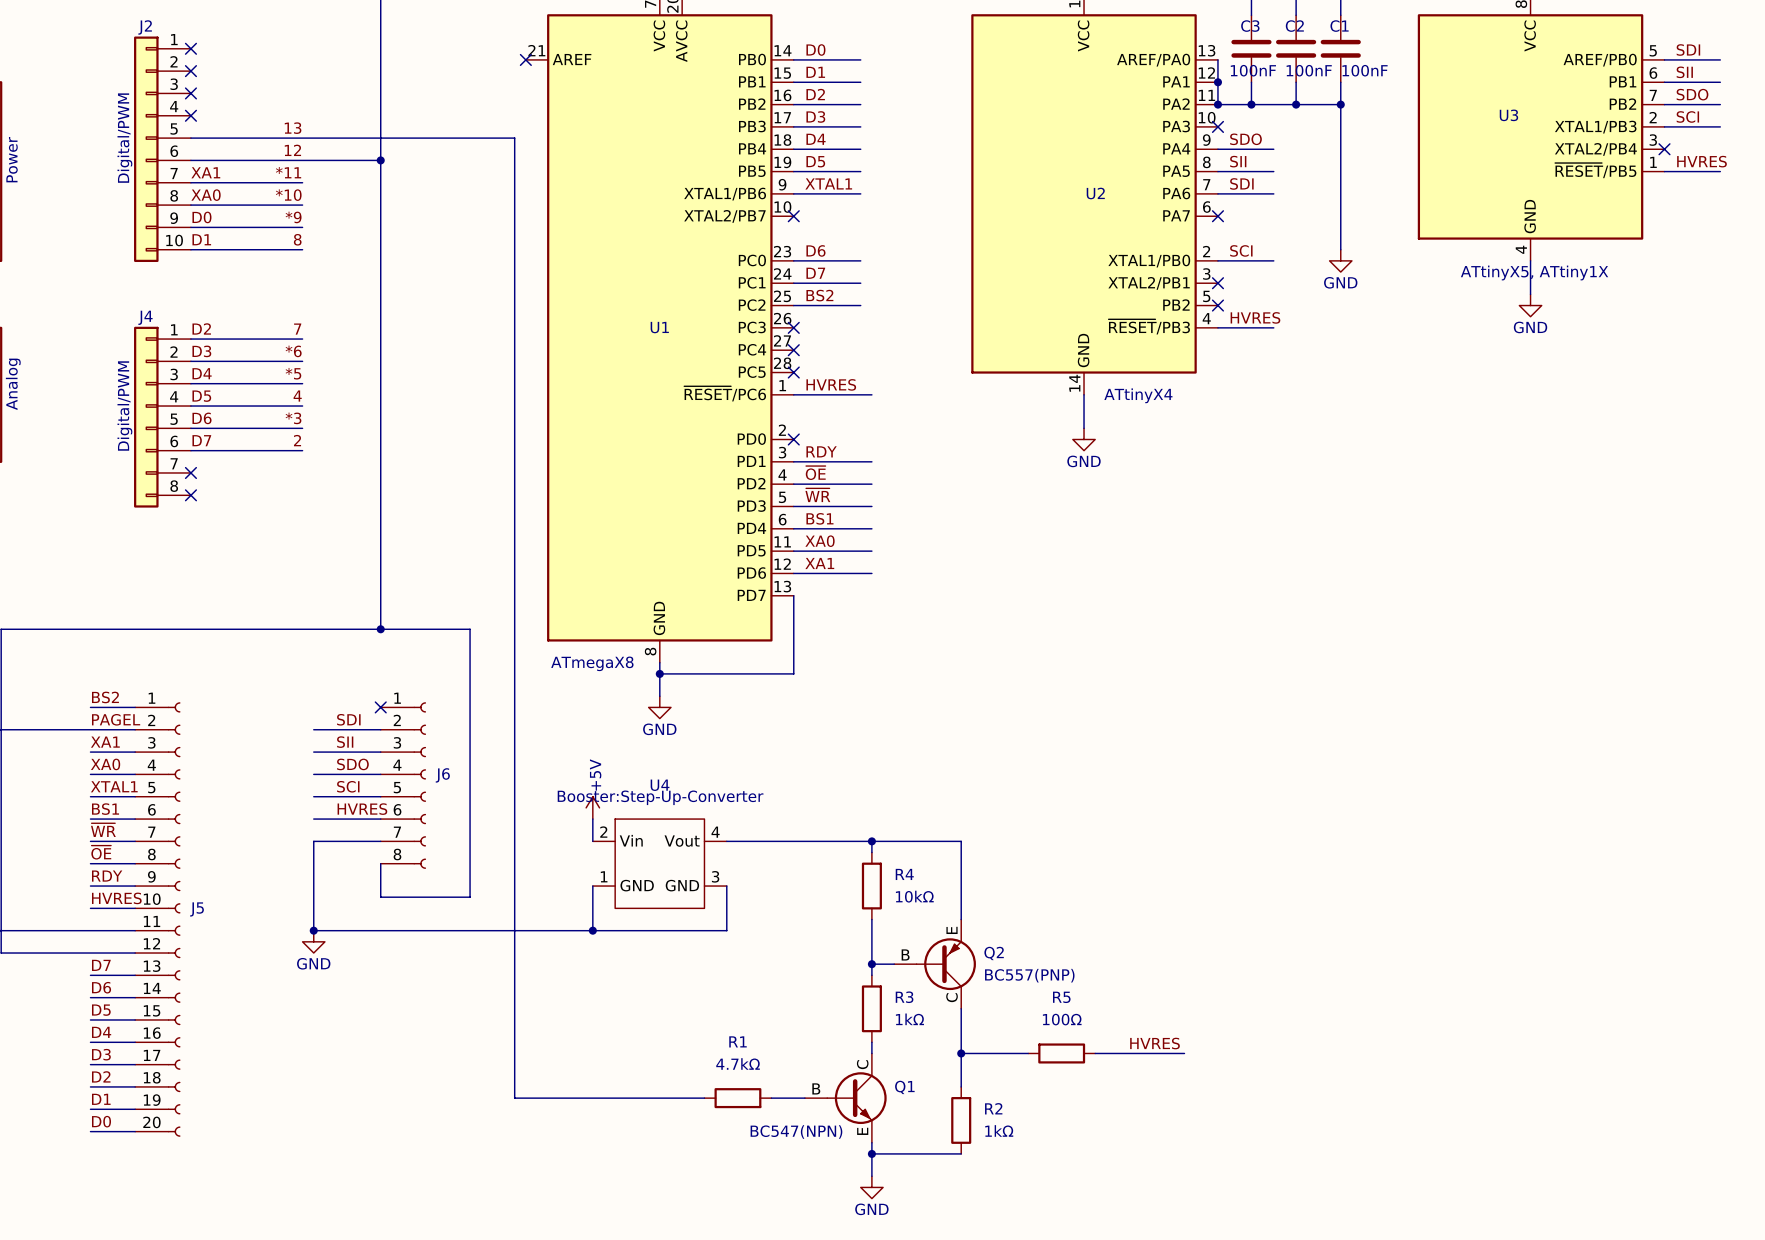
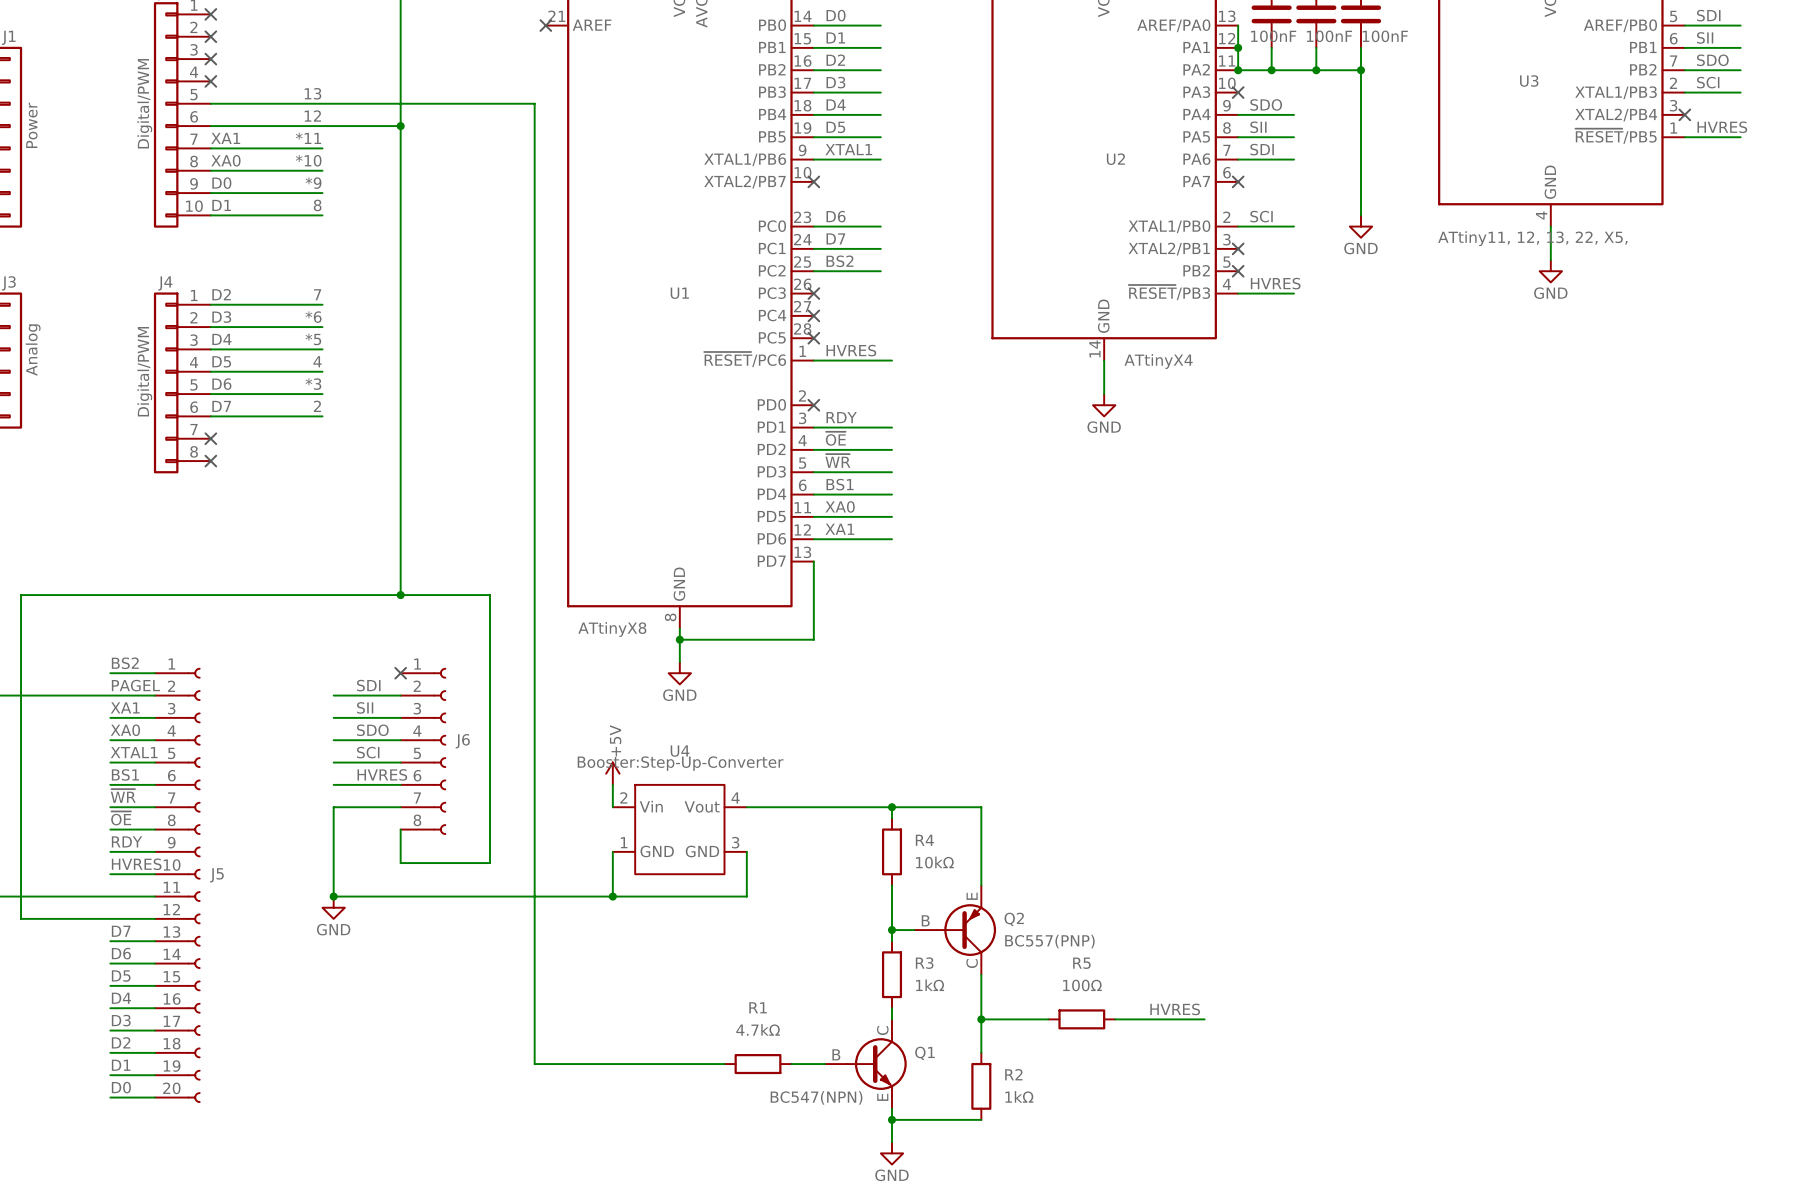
U3 value: ATtinyX5, ATtiny1X (1534, 272) -> ATtiny11, 12, 13, 22, X5, (1532, 238)
U1 value: ATmegaX8 (592, 663) -> ATtinyX8 (612, 629)

